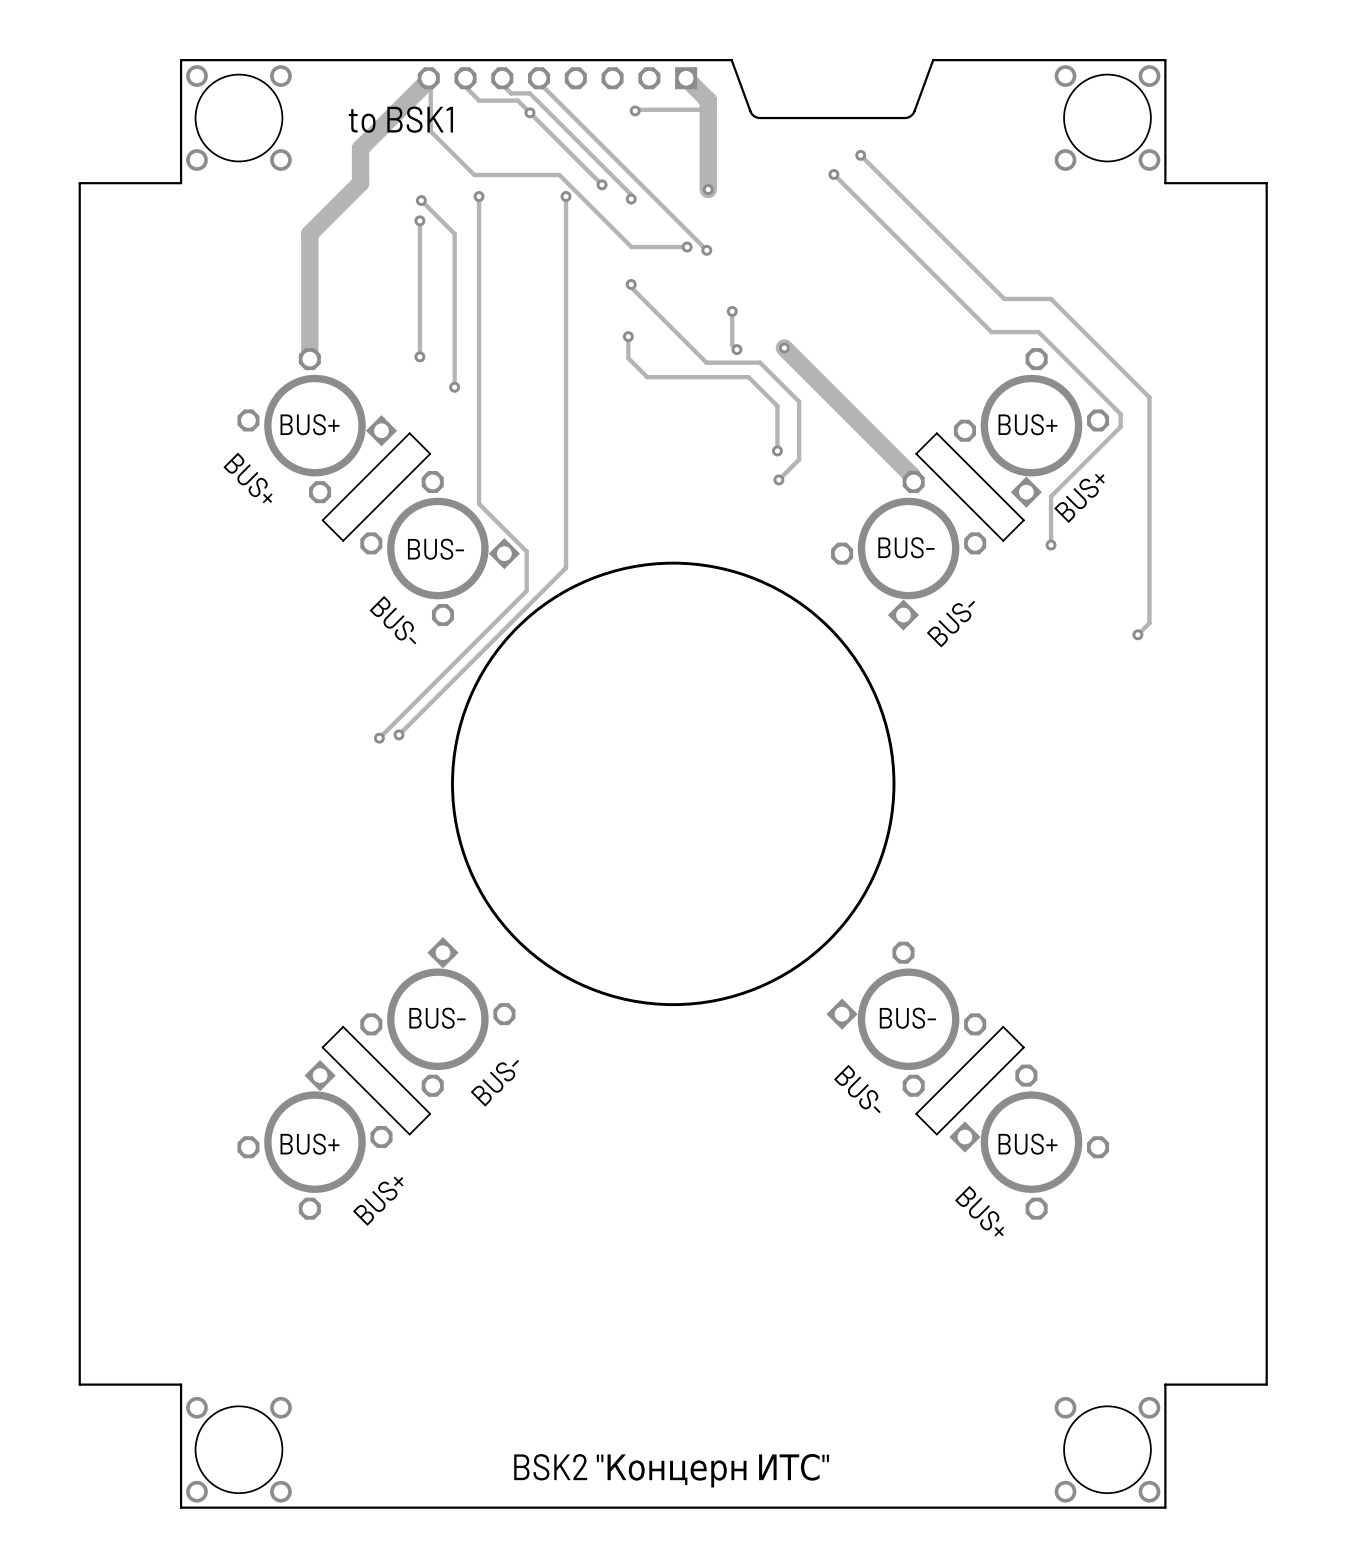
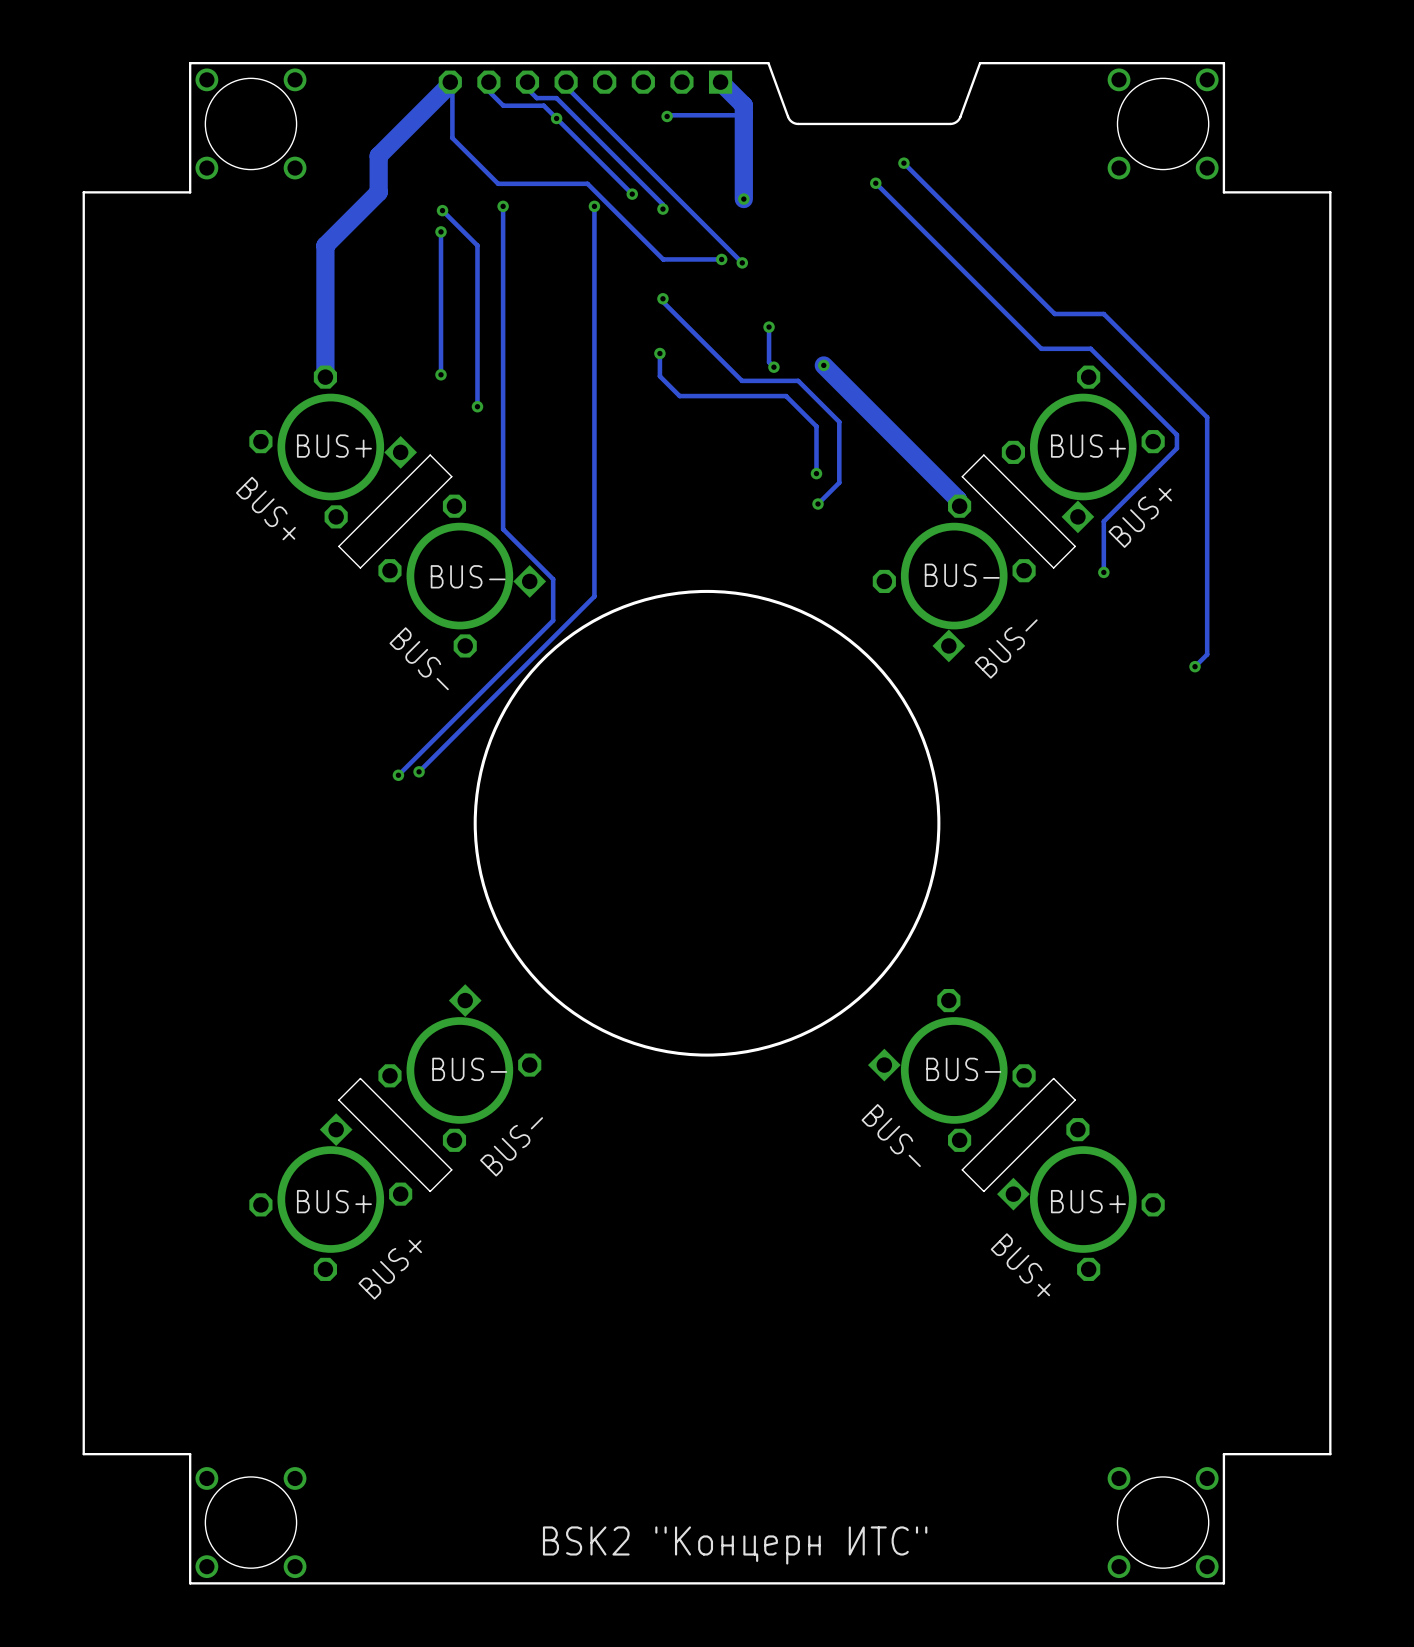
text: to BSK1 (400, 119) -> none

